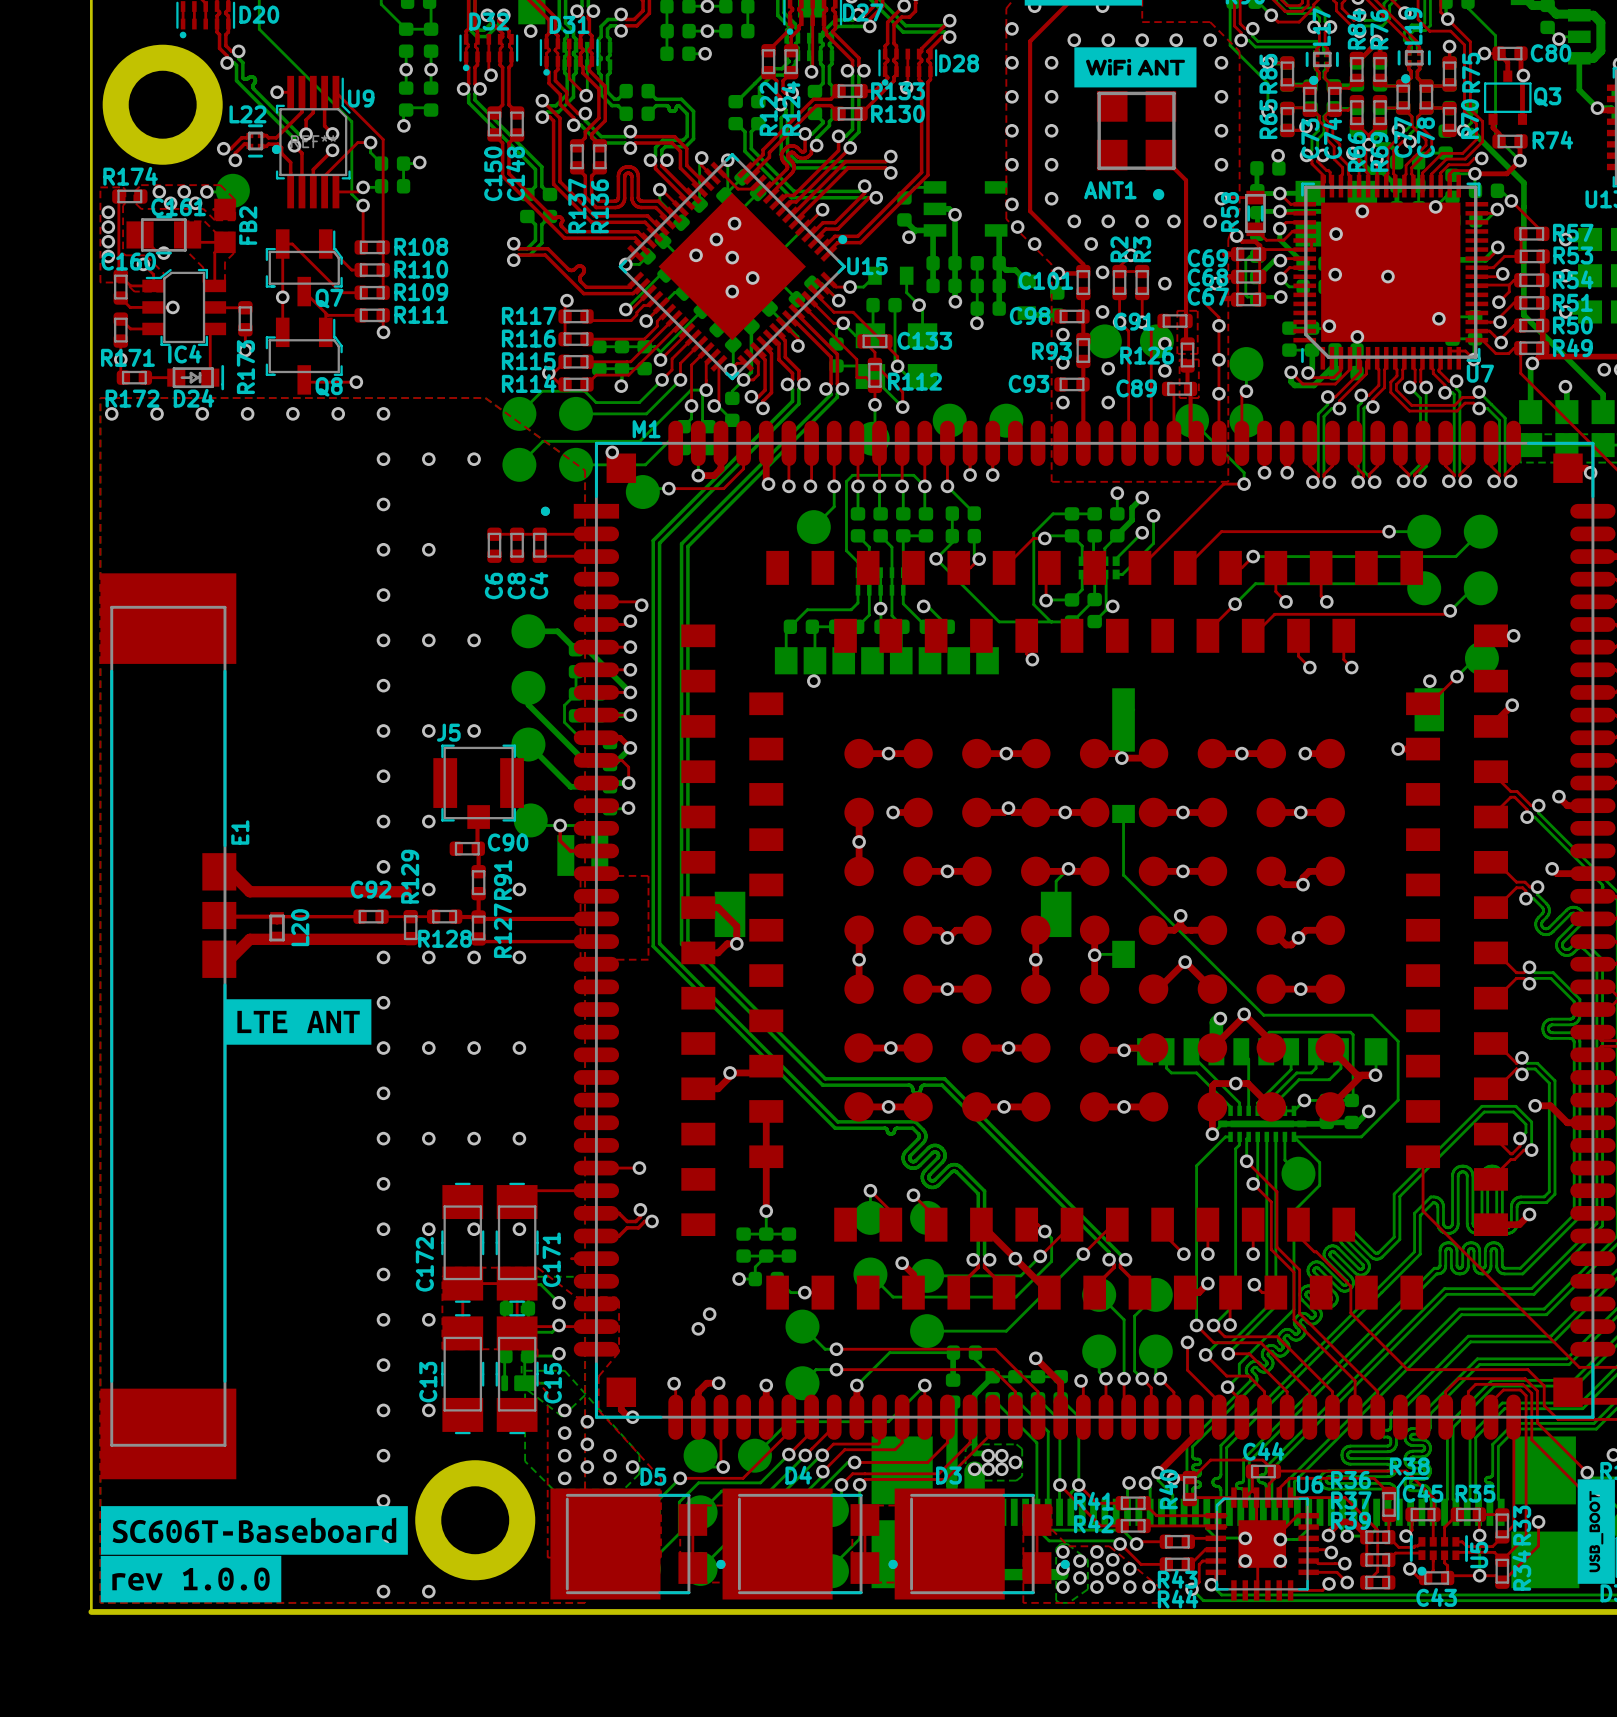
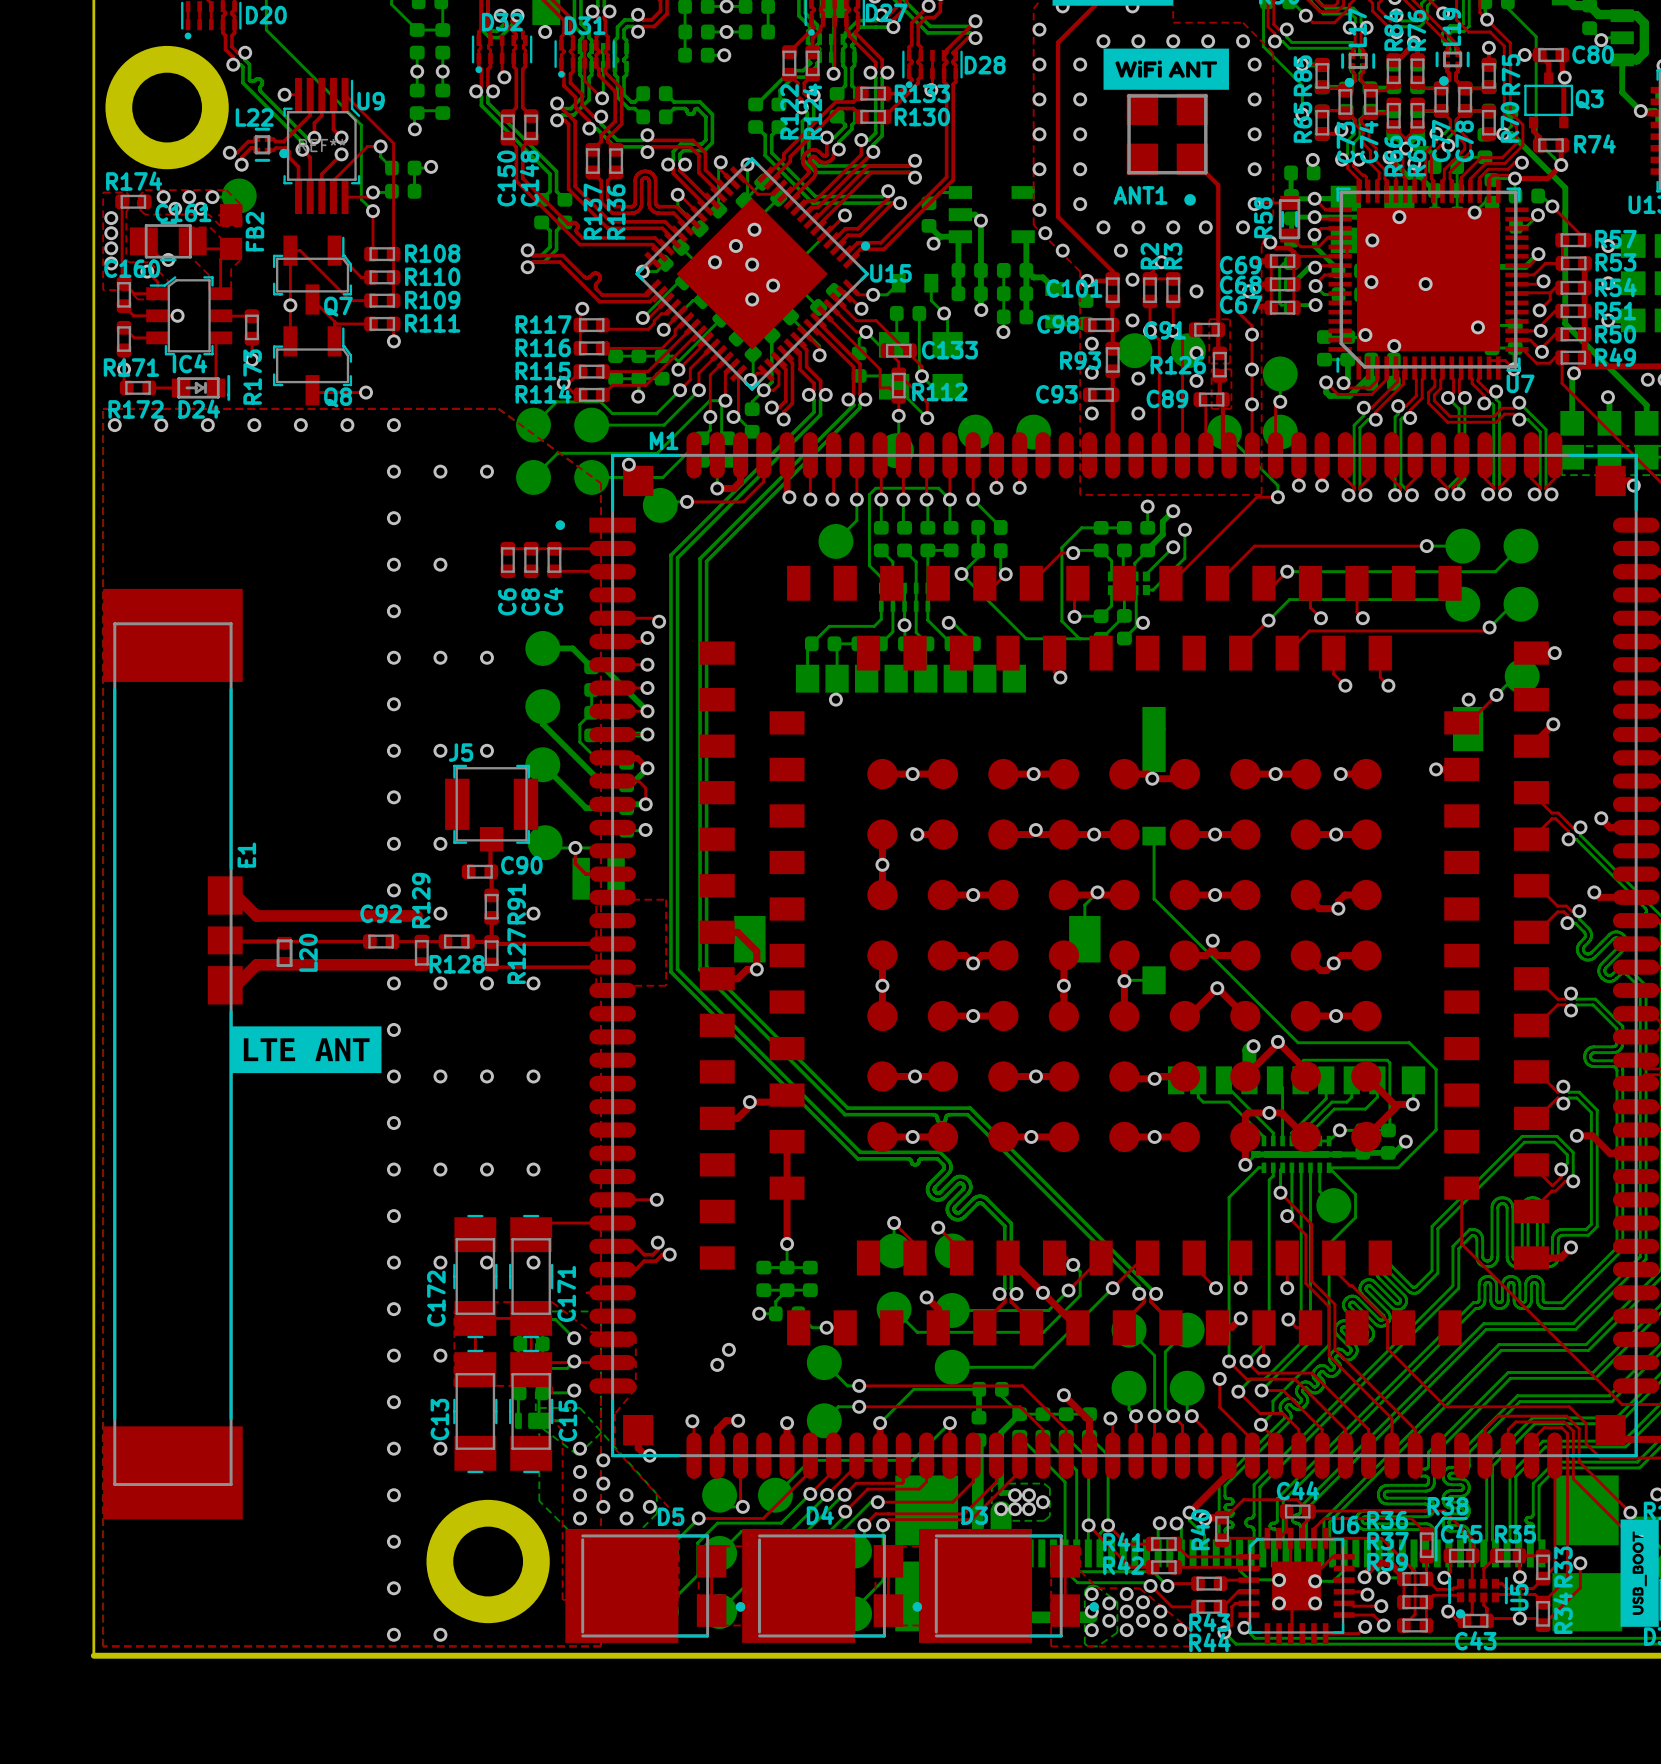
drawing: [100, 1506, 408, 1603] -> none

